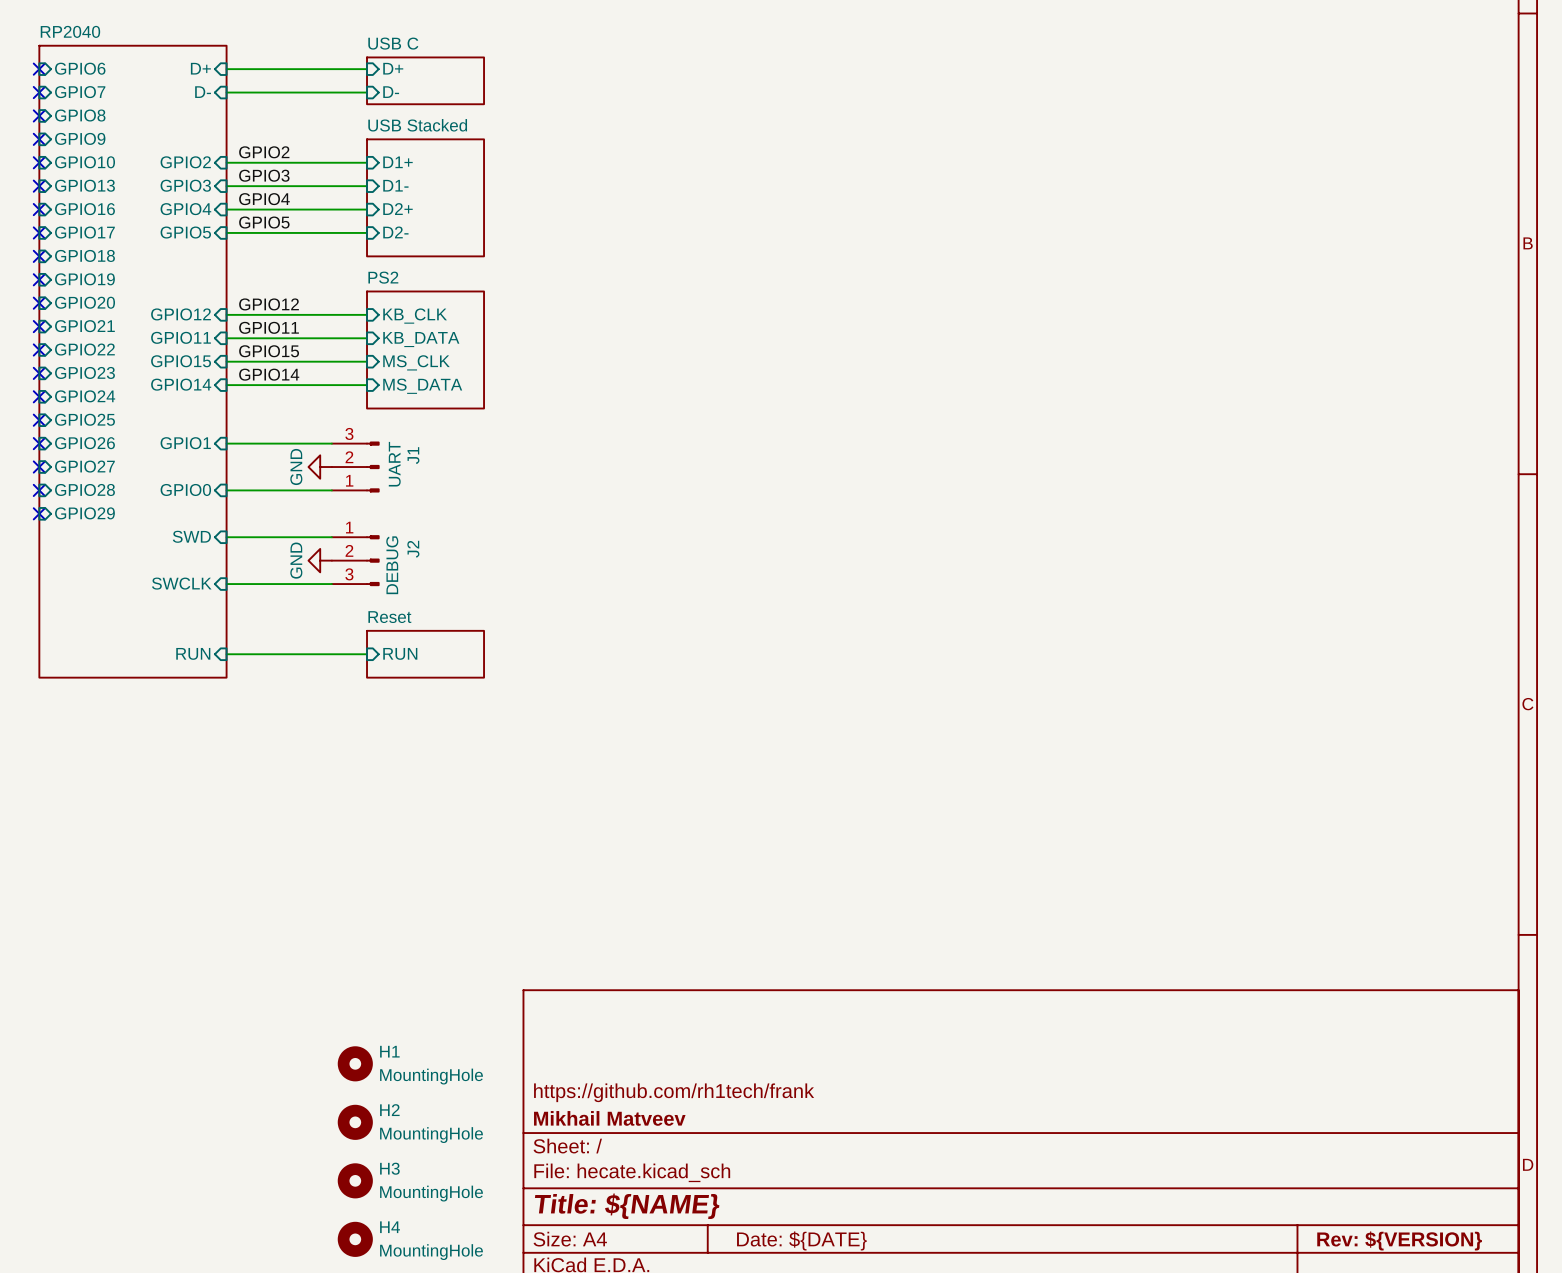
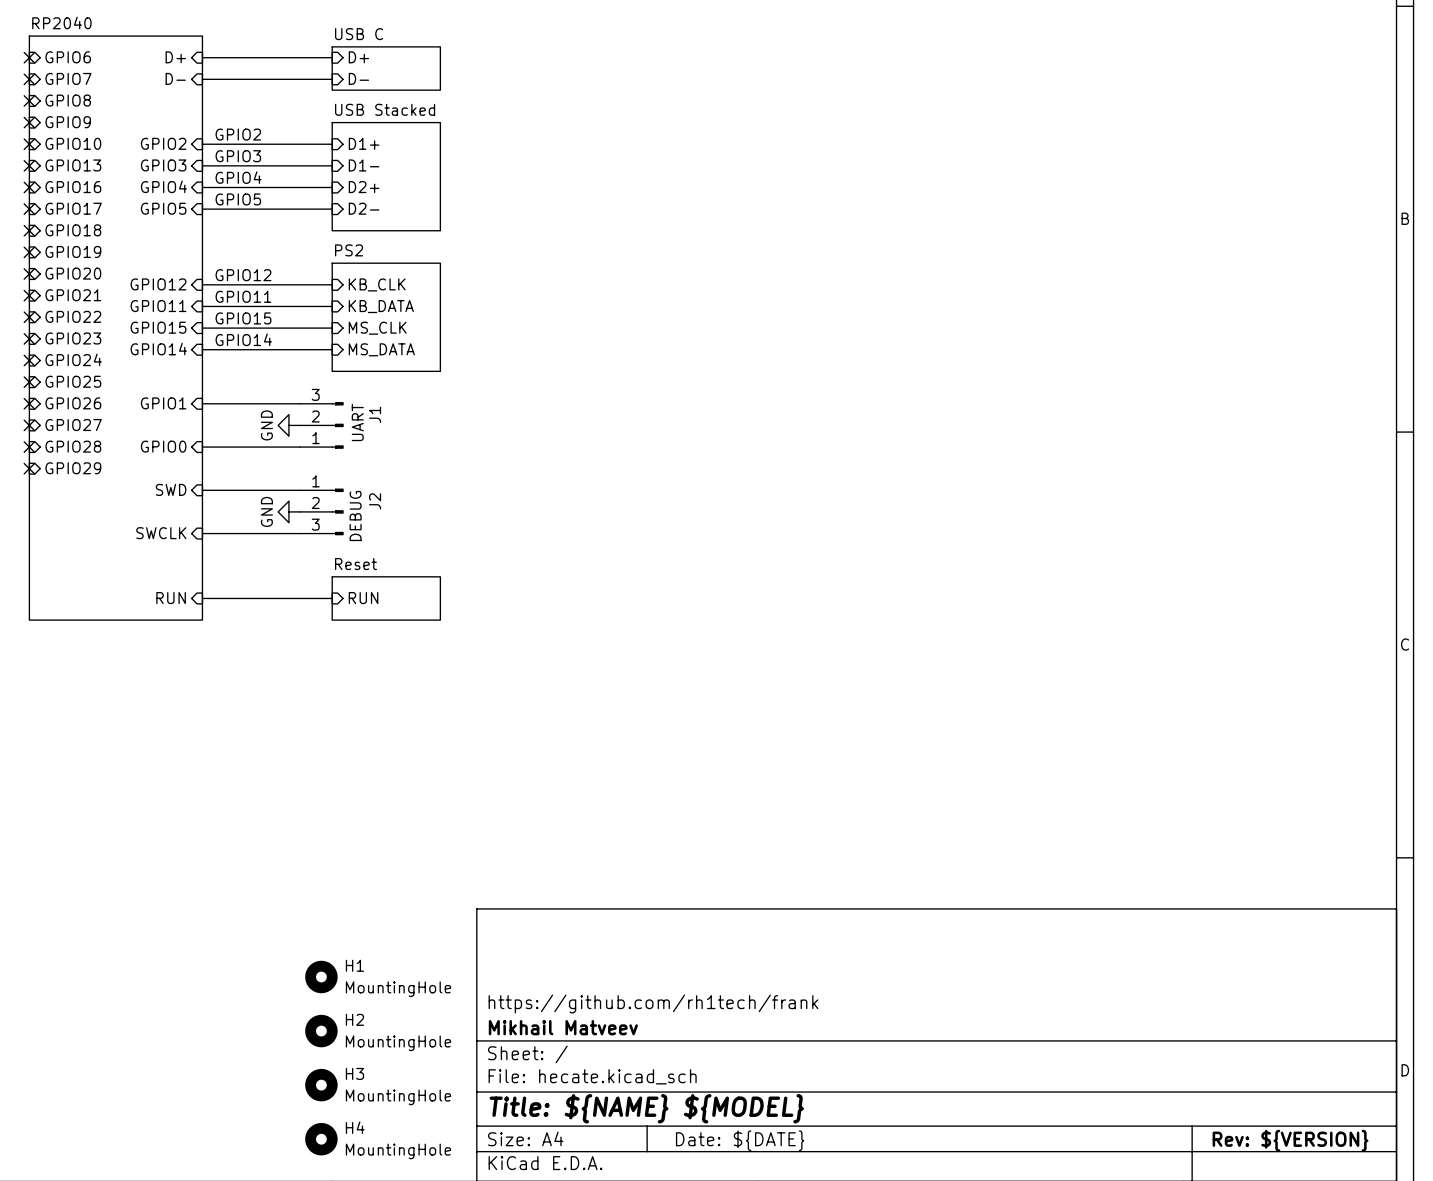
title block: Title: ${NAME} (627, 1206) -> Title: ${NAME} ${MODEL} (646, 1108)

